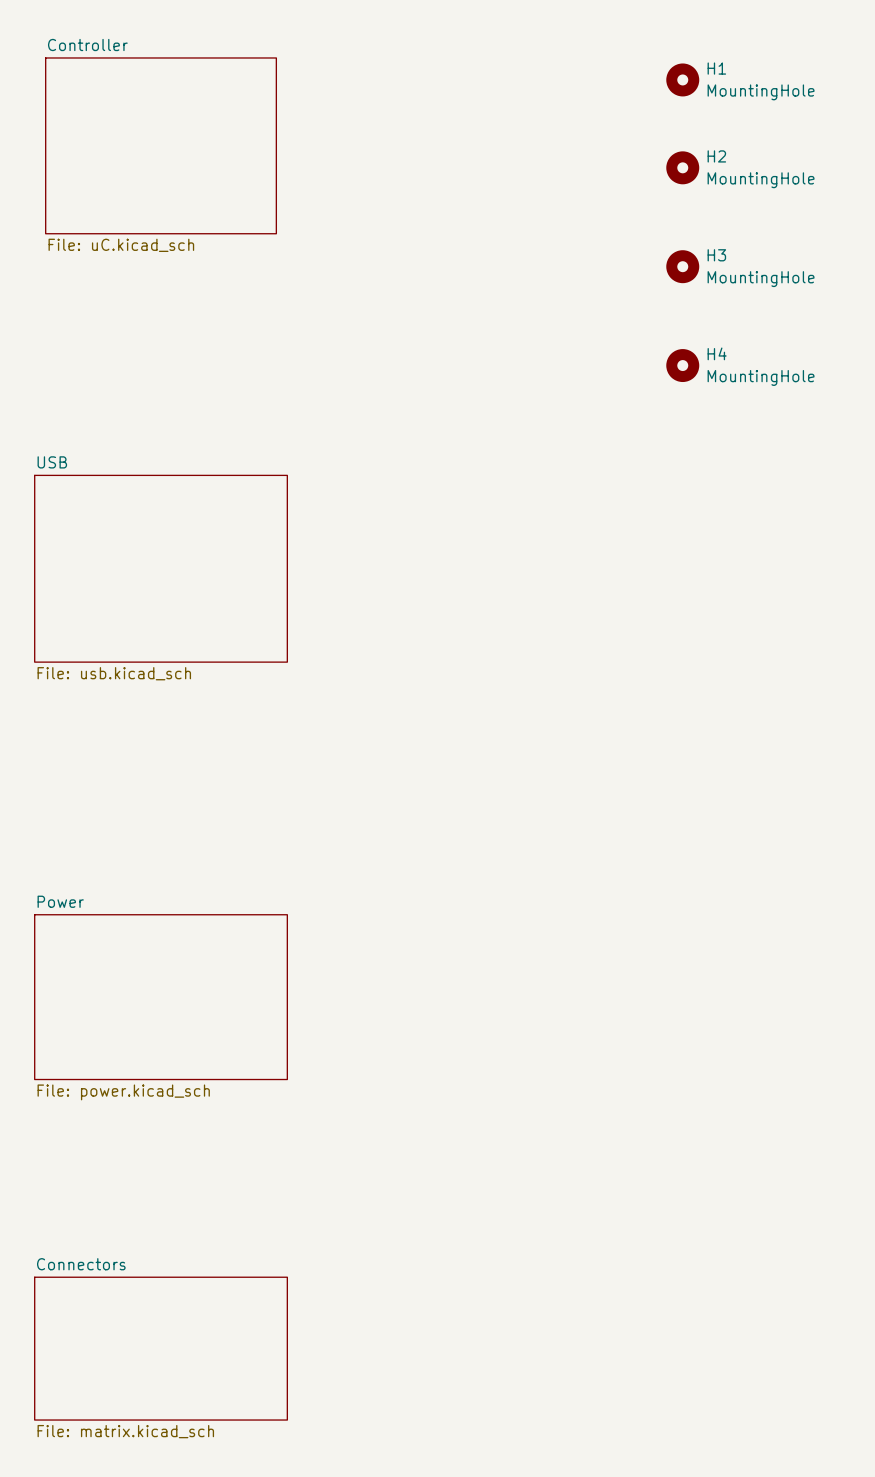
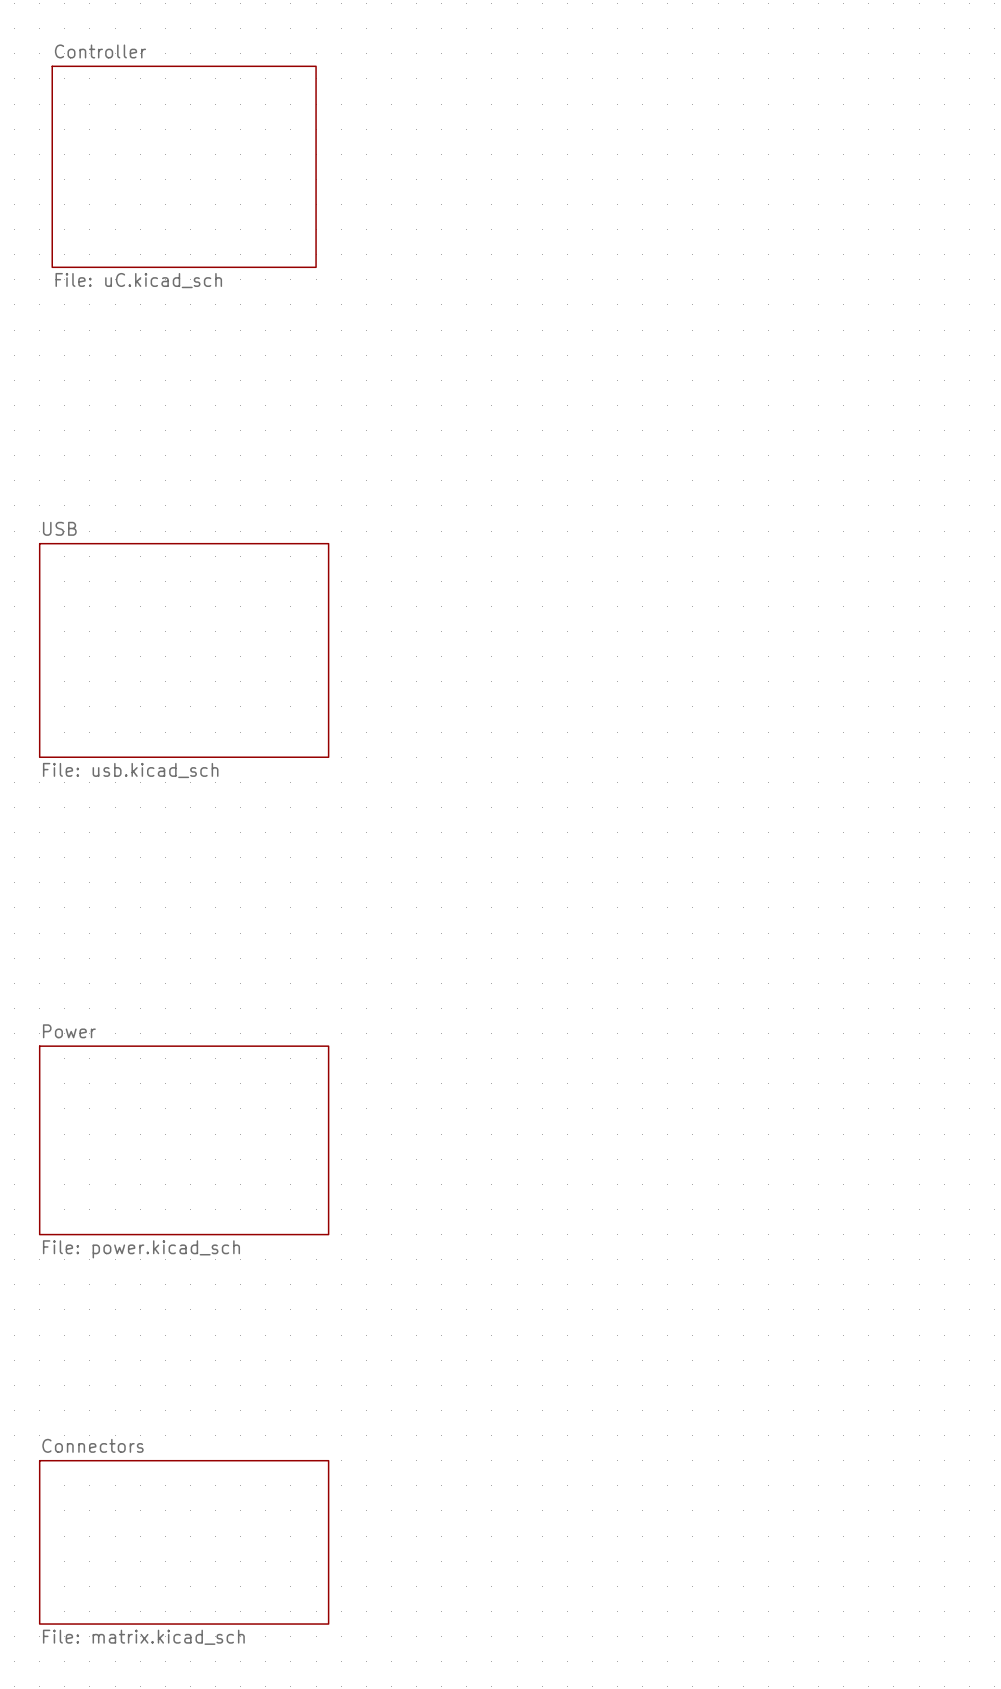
H1: MountingHole (682, 79) -> none
H2: MountingHole (682, 167) -> none
H3: MountingHole (682, 266) -> none
H4: MountingHole (682, 365) -> none

